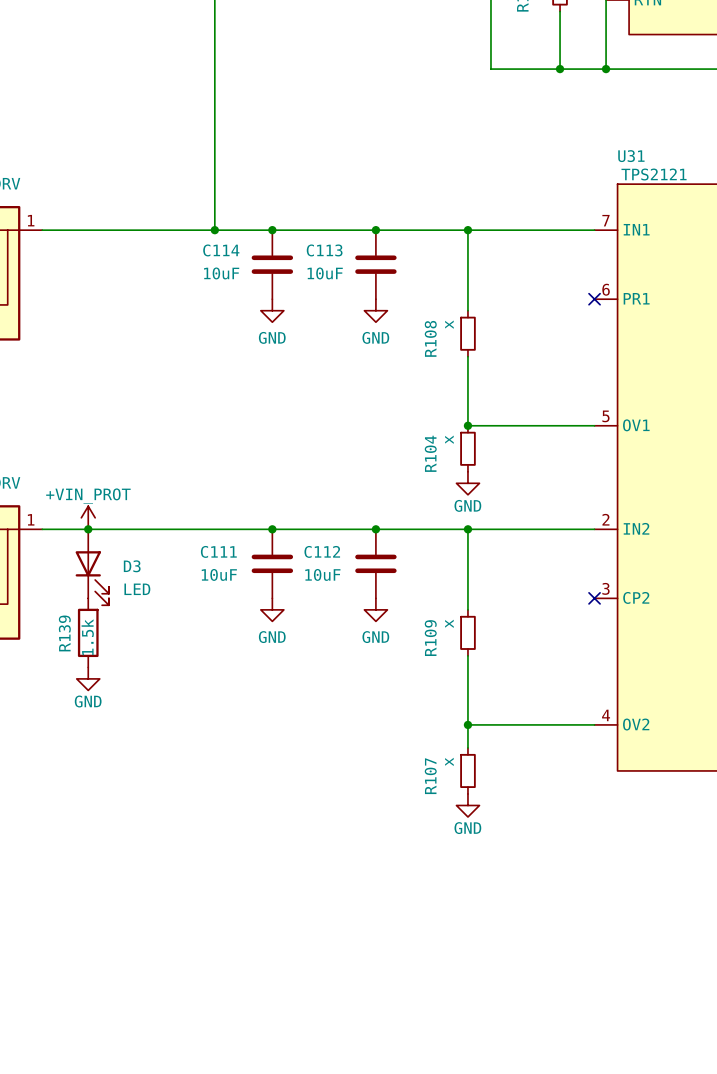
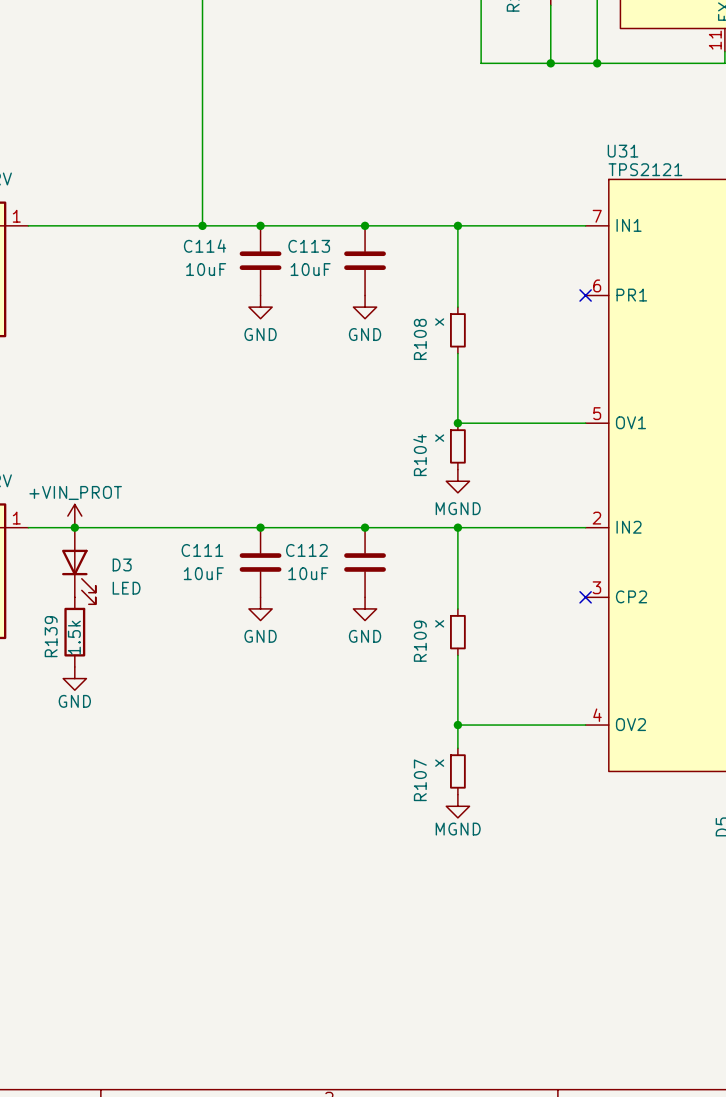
power symbol: GND (467, 483) -> MGND (457, 481)
power symbol: GND (467, 805) -> MGND (457, 806)

